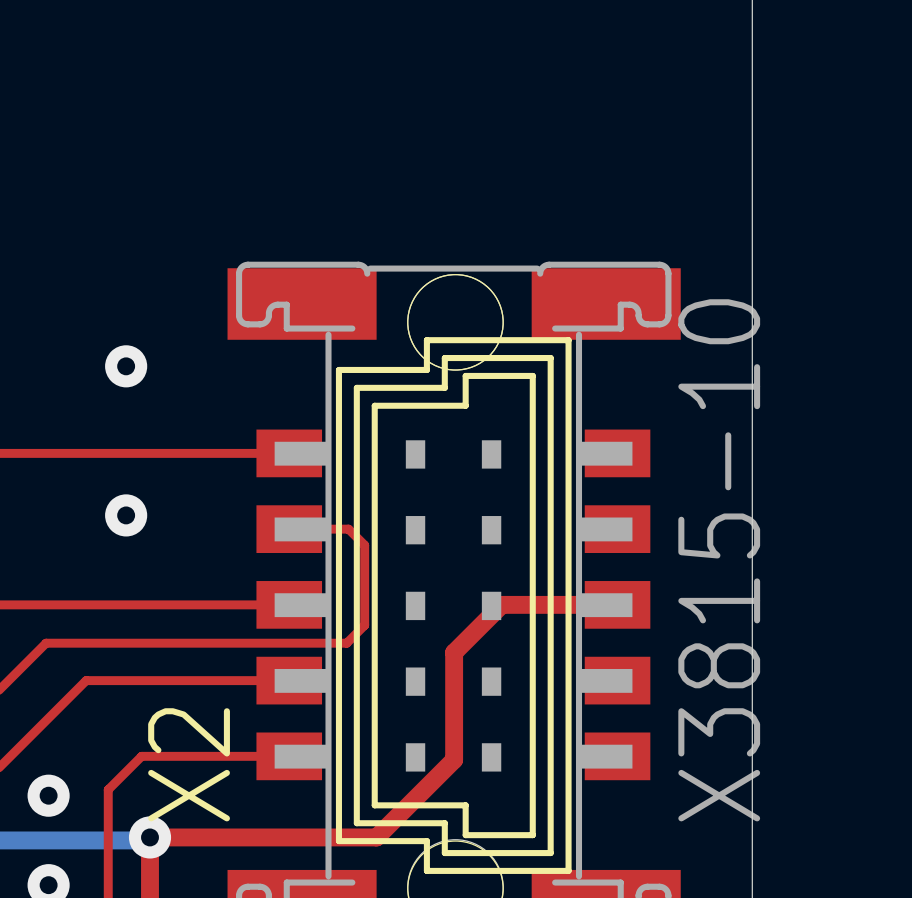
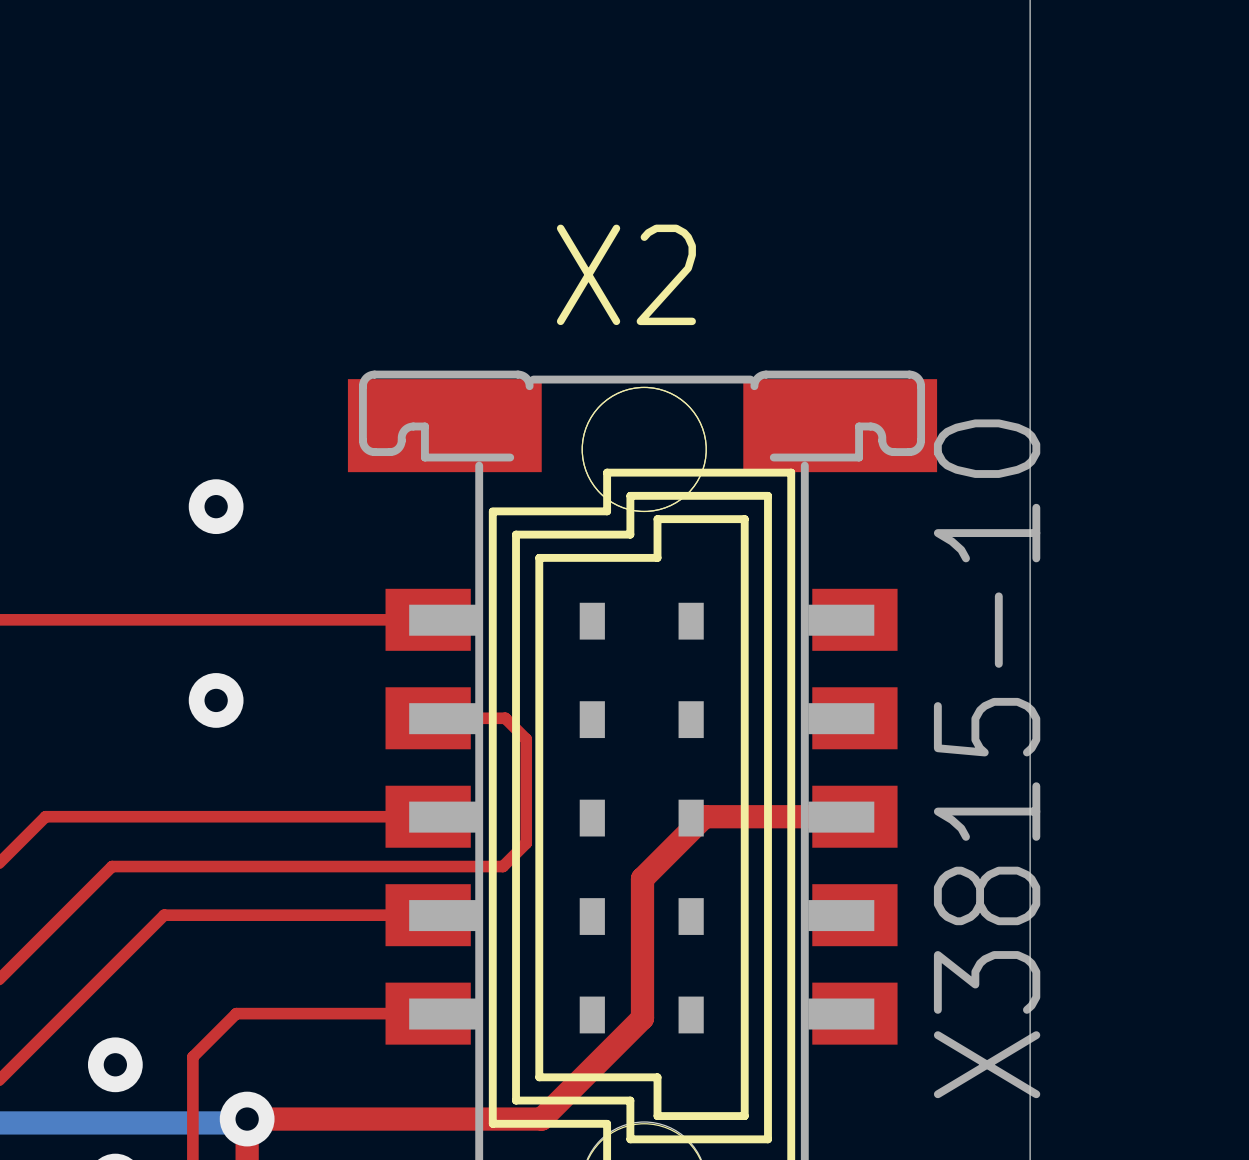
X2 name rotation: 0° (189, 764) -> 90° clockwise (626, 274)
X2 name position: X2 (189, 764) -> X2 (626, 274)

